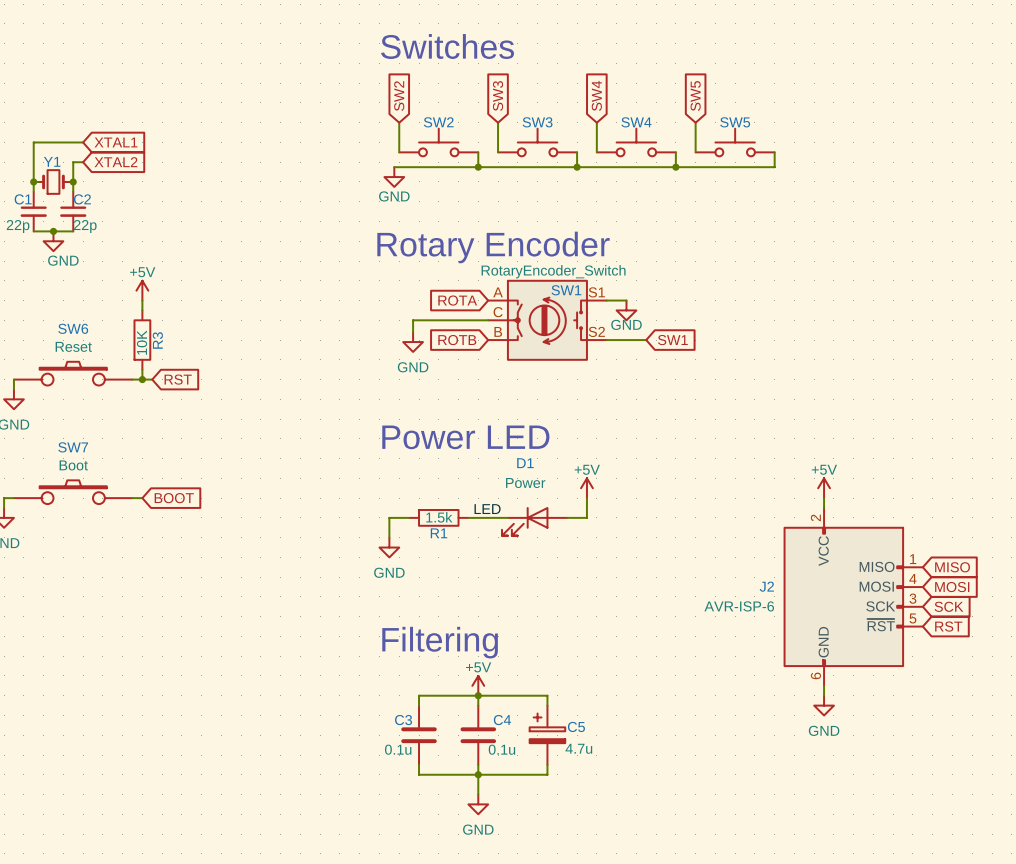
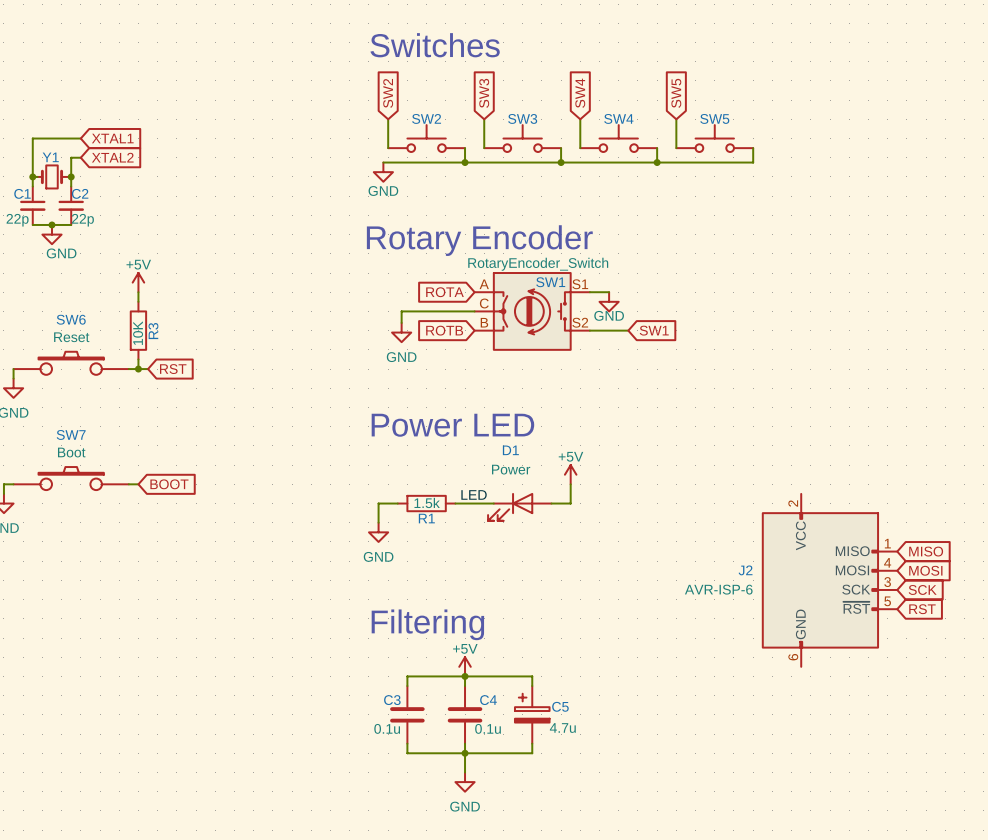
power symbol: +5V (824, 488) -> none
wire: (824, 498) (824, 508) -> none
wire: (824, 685) (824, 695) -> none
power symbol: GND (824, 705) -> none

